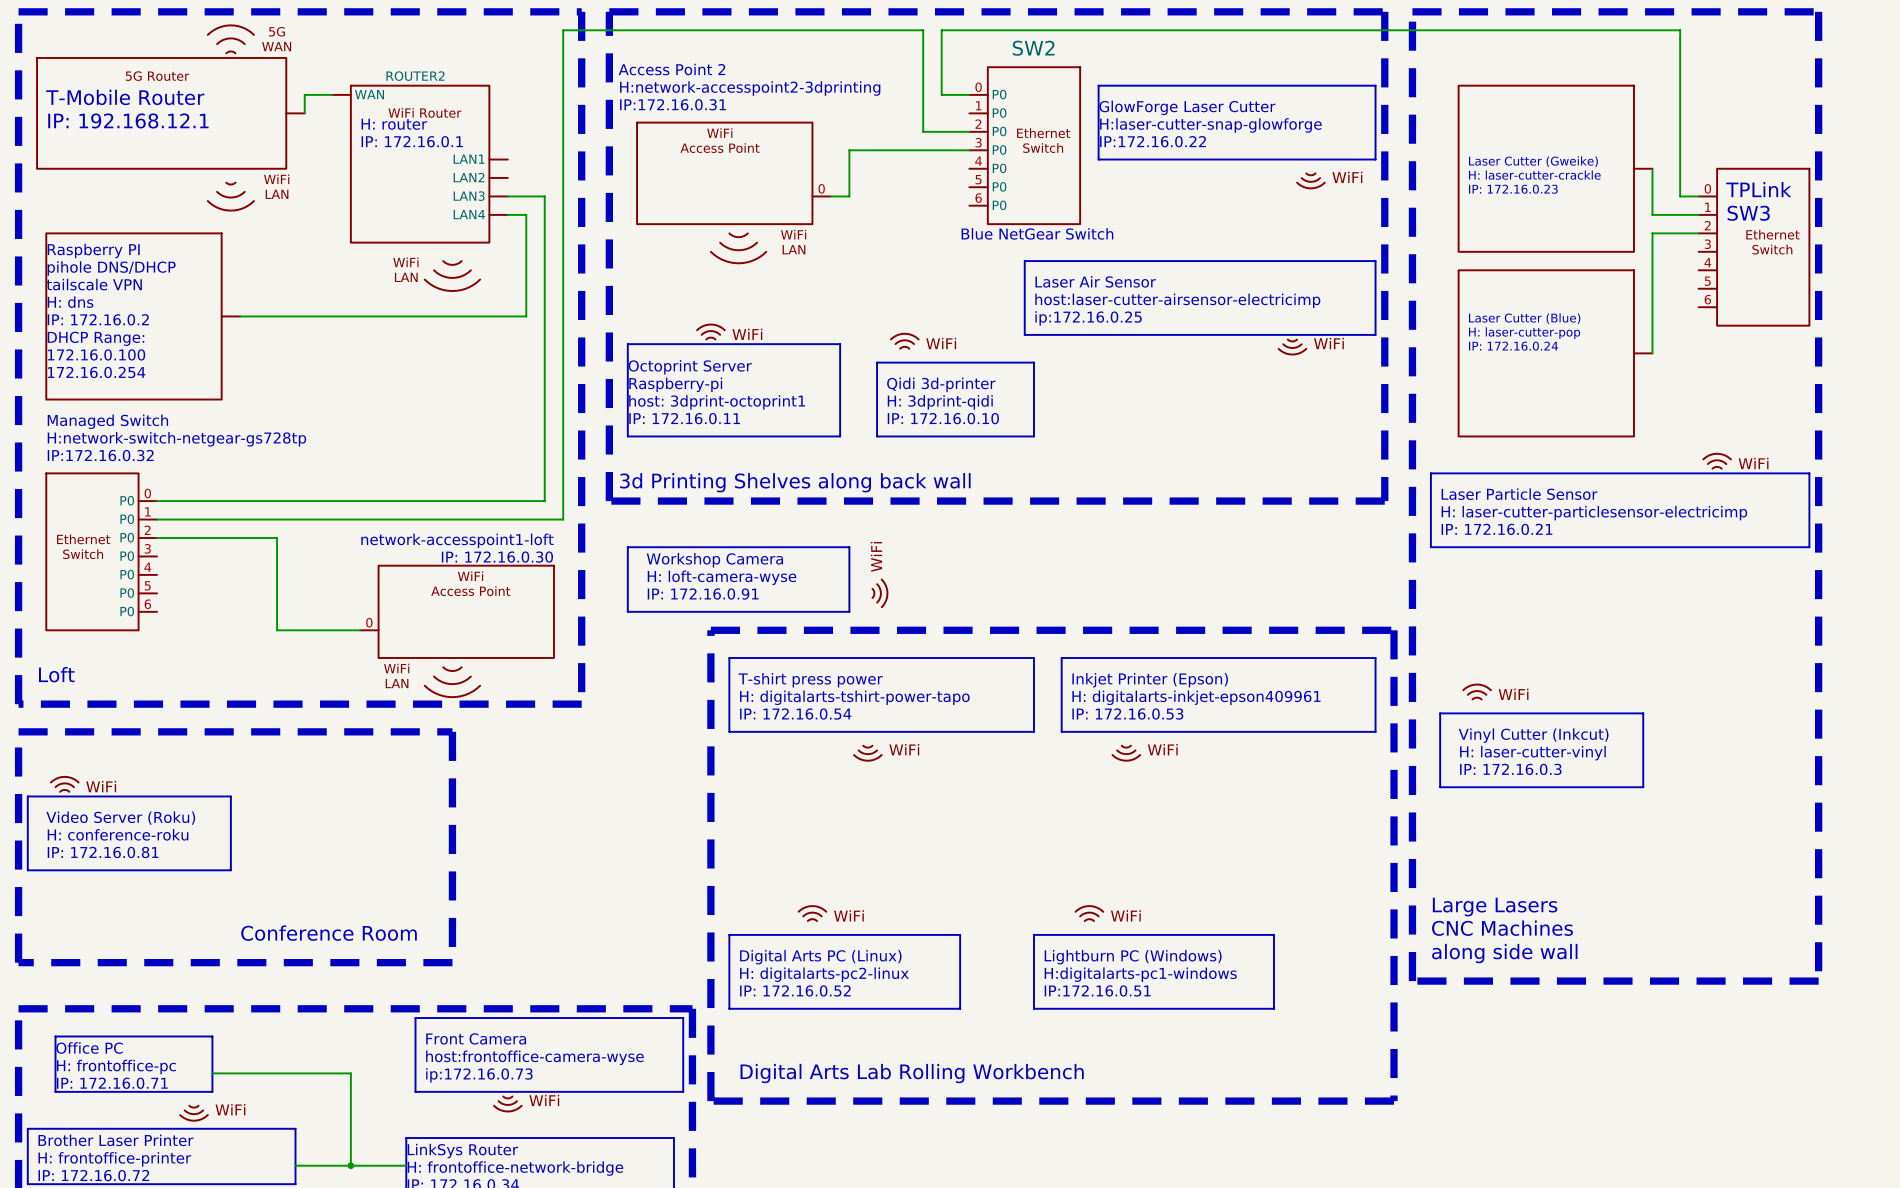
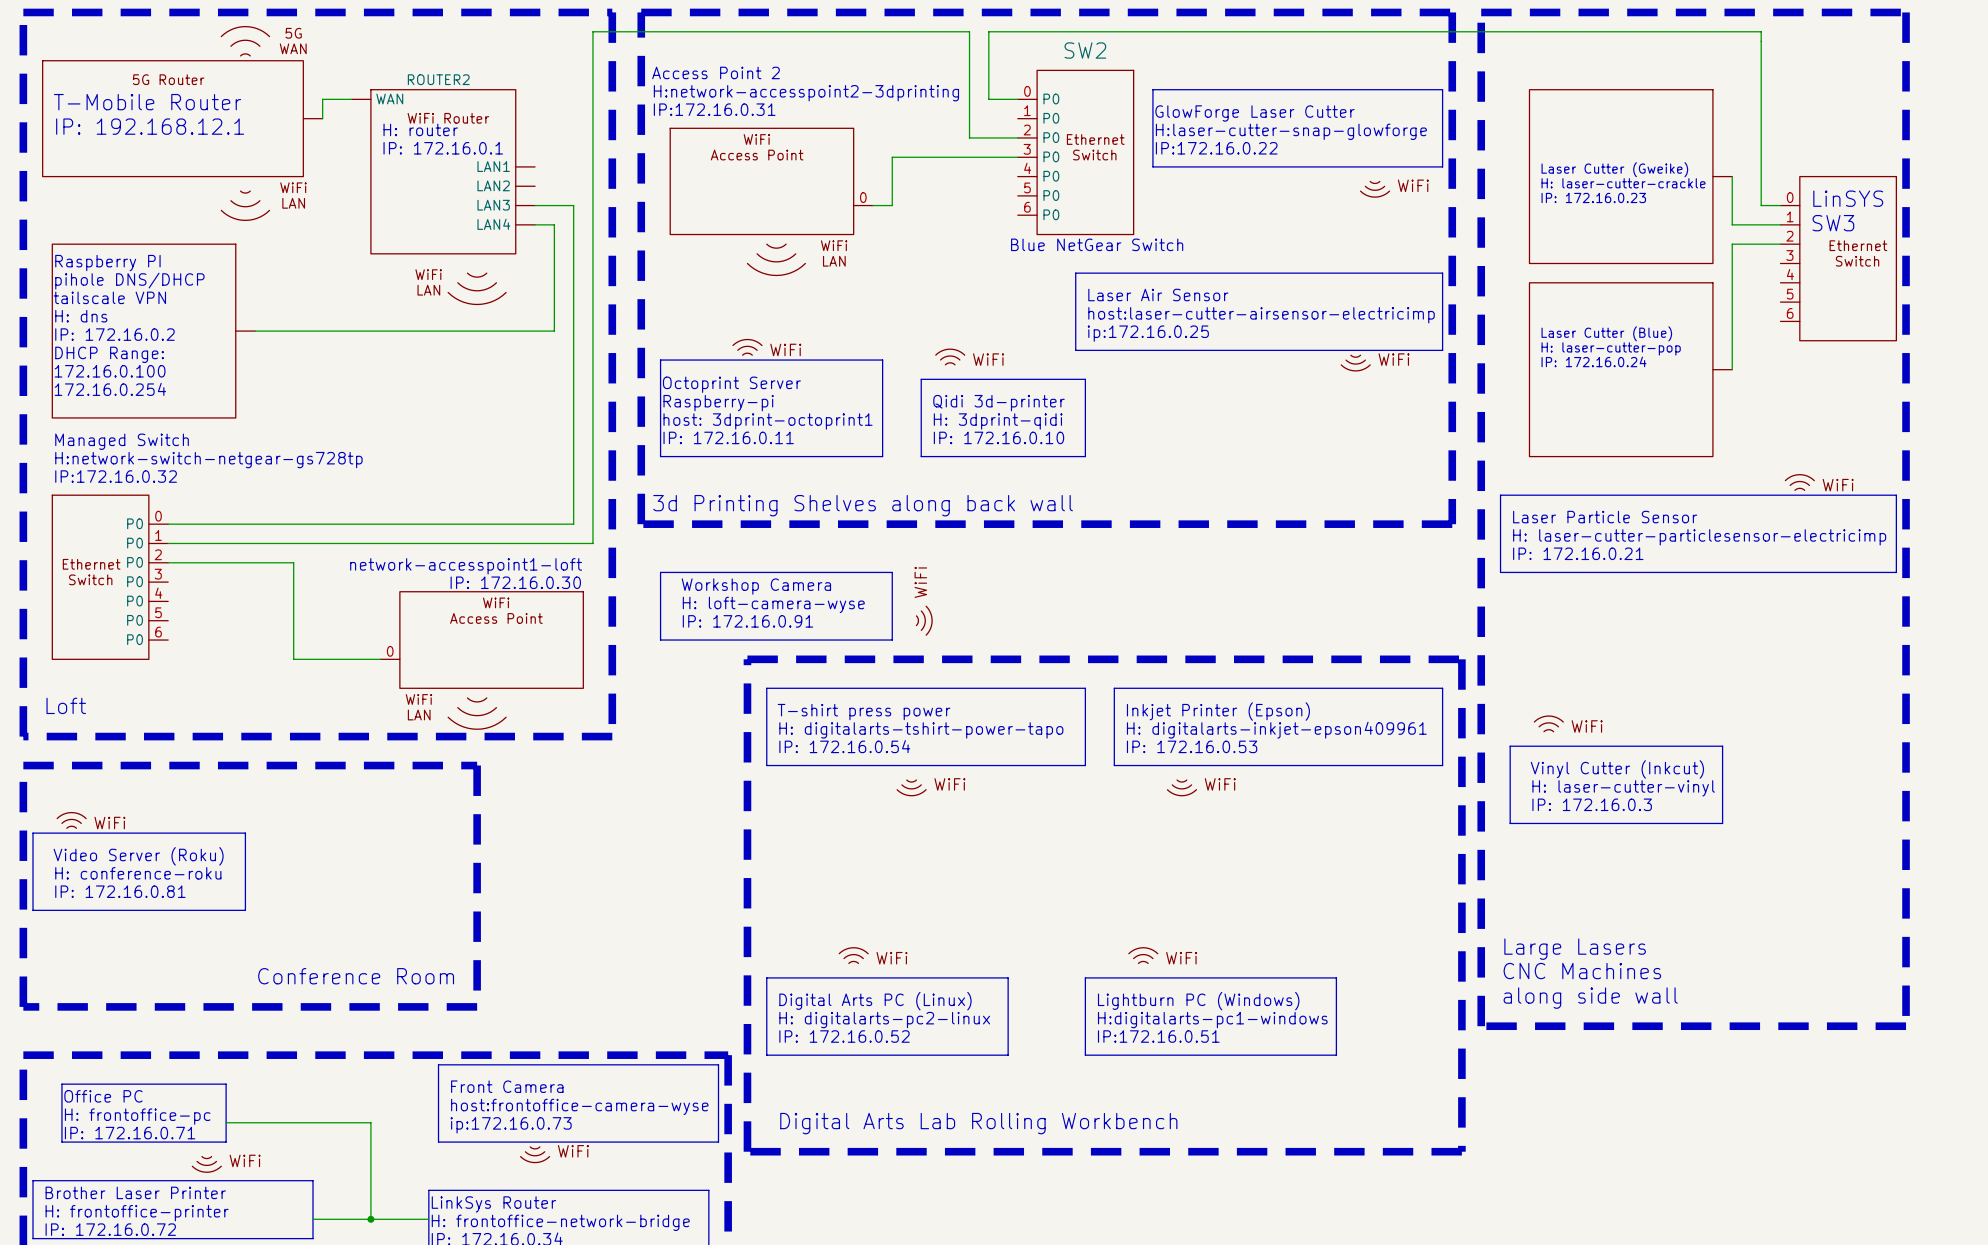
text: TPLink (1758, 189) -> LinSYS (1848, 198)

